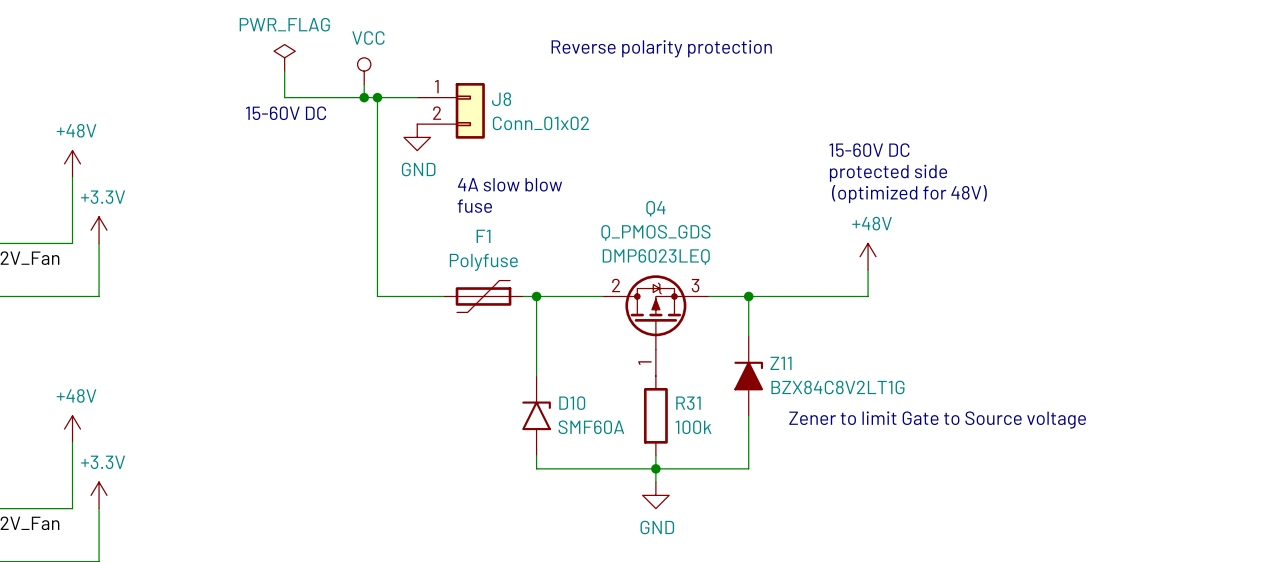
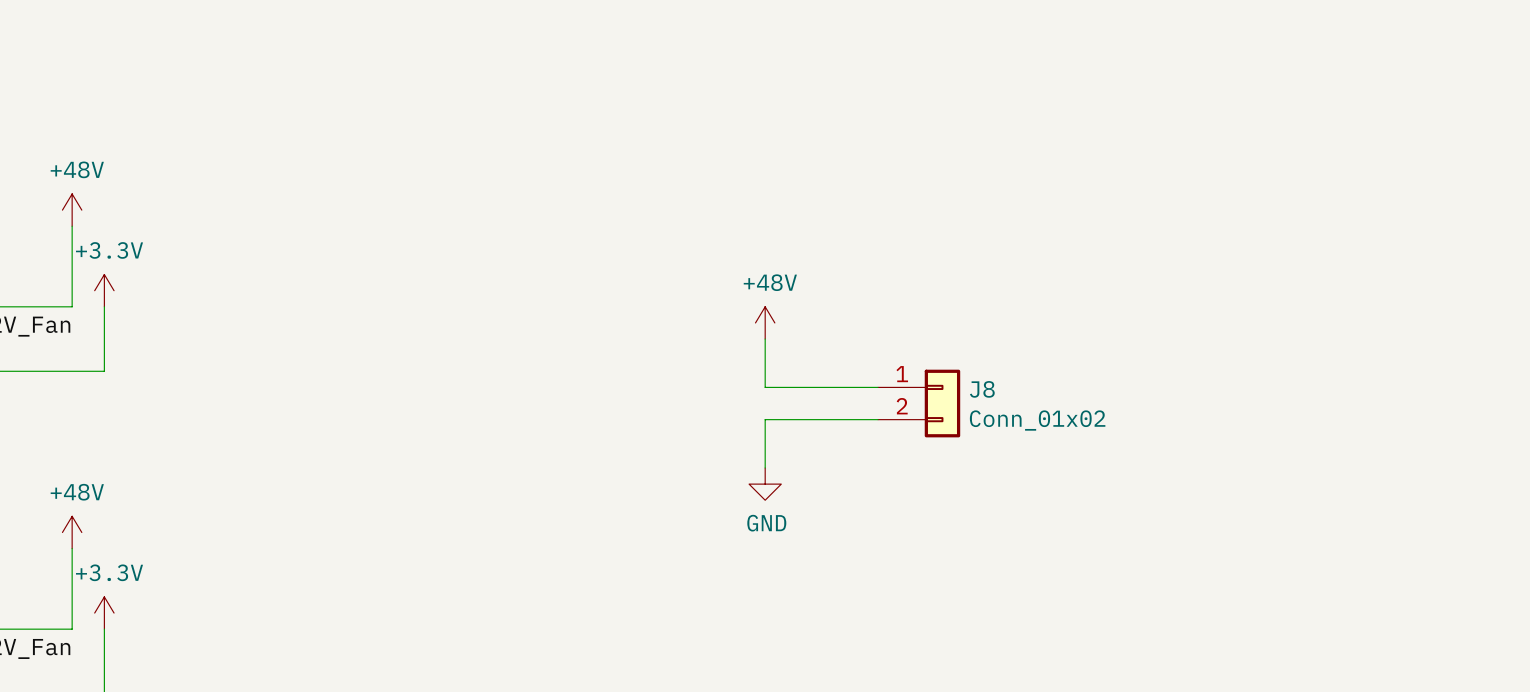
text: Reverse polarity protection (661, 48) -> none
power symbol: PWR_FLAG (284, 57) -> none
wire: (284, 71) (284, 97) (417, 97) -> none
power symbol: VCC (364, 71) -> none
wire: (364, 84) (364, 97) -> none
junction: (364, 97) -> none
wire: (377, 97) (377, 296) (443, 296) -> none
junction: (377, 97) -> none
J8 position: (451, 110) -> (919, 403)
text: 15-60V DC (286, 113) -> none
power symbol: GND (417, 137) -> none
text: 15-60V DC (869, 150) -> none
text: protected side (888, 173) -> none
text: 4A slow blow (510, 184) -> none
text: (optimized for 48V) (909, 194) -> none
text: fuse (474, 206) -> none
power symbol position: +48V (868, 256) -> +48V (765, 322)
wire: none -> (765, 339) (765, 387) (878, 387)
wire: (868, 269) (868, 296) (708, 296) -> none
F1: Polyfuse (483, 296) -> none
wire: (523, 296) (602, 296) -> none
wire: (536, 296) (536, 376) -> none
junction: (536, 296) -> none
wire: (748, 296) (748, 336) -> none
junction: (748, 296) -> none
Q4: Q_PMOS_GDS (655, 325) -> none
wire: none -> (878, 419) (765, 419) (765, 467)
Z11: BZX84C8V2LT1G (748, 376) -> none
D10: SMF60A (536, 415) -> none
R31: 100k (655, 415) -> none
wire: (748, 415) (748, 468) (536, 468) (536, 455) -> none
text: Zener to limit Gate to Source voltage (937, 420) -> none
wire: (655, 455) (655, 482) -> none
junction: (655, 468) -> none
power symbol position: GND (655, 495) -> GND (765, 484)

